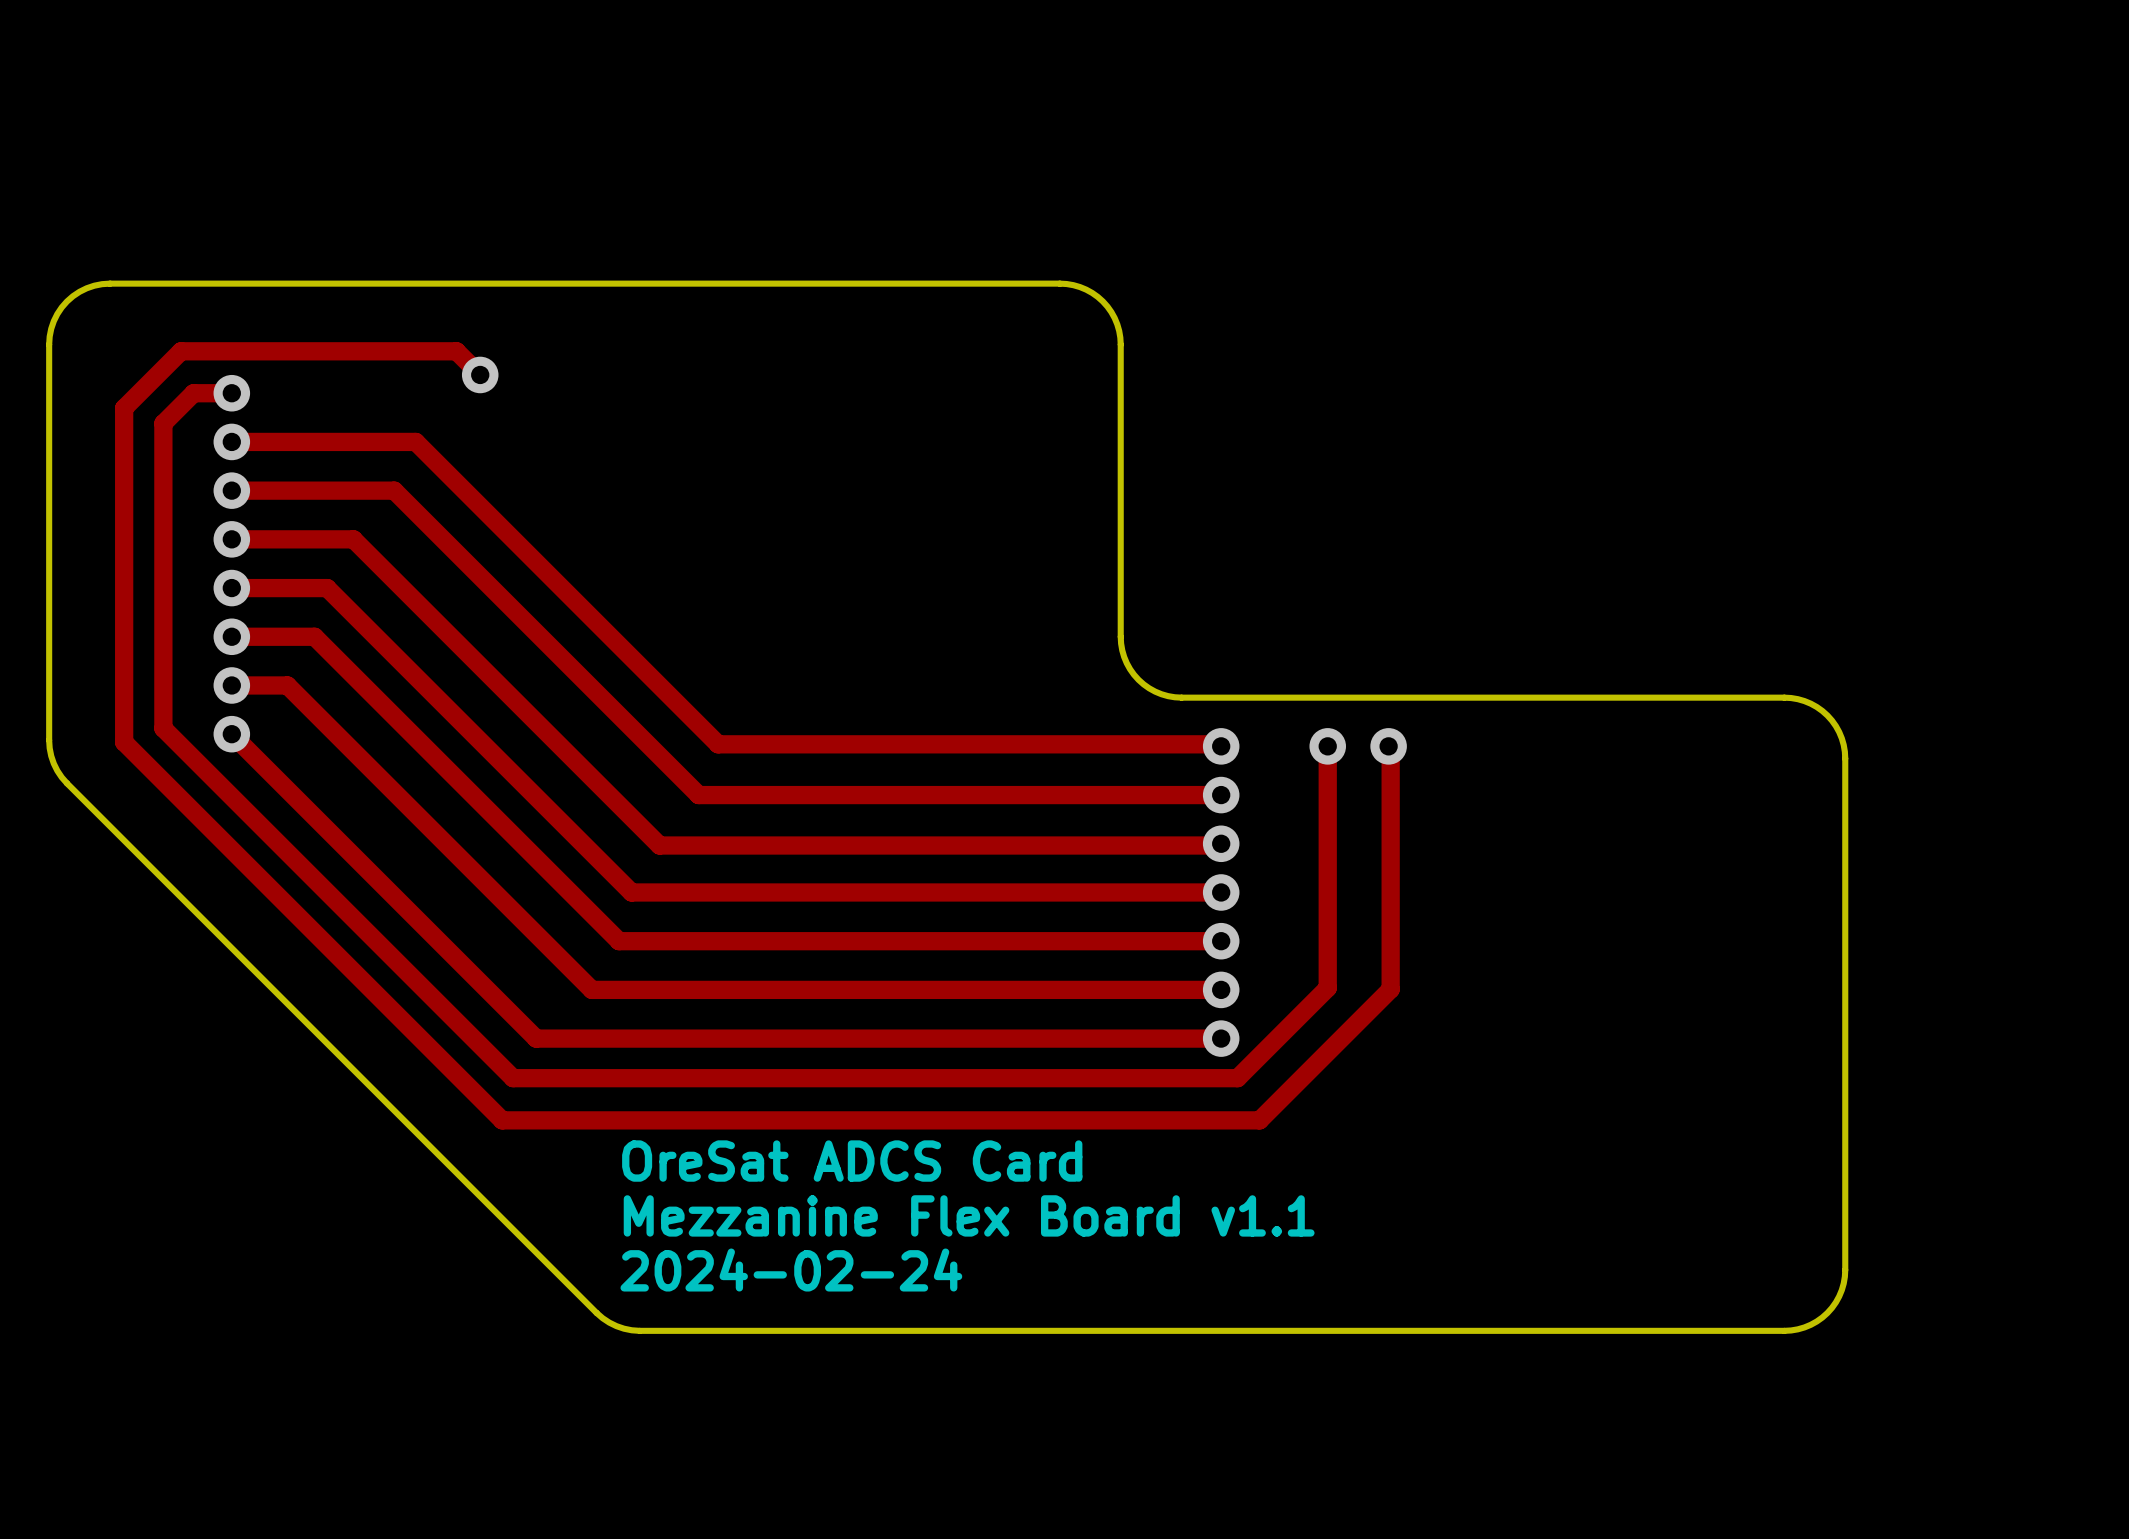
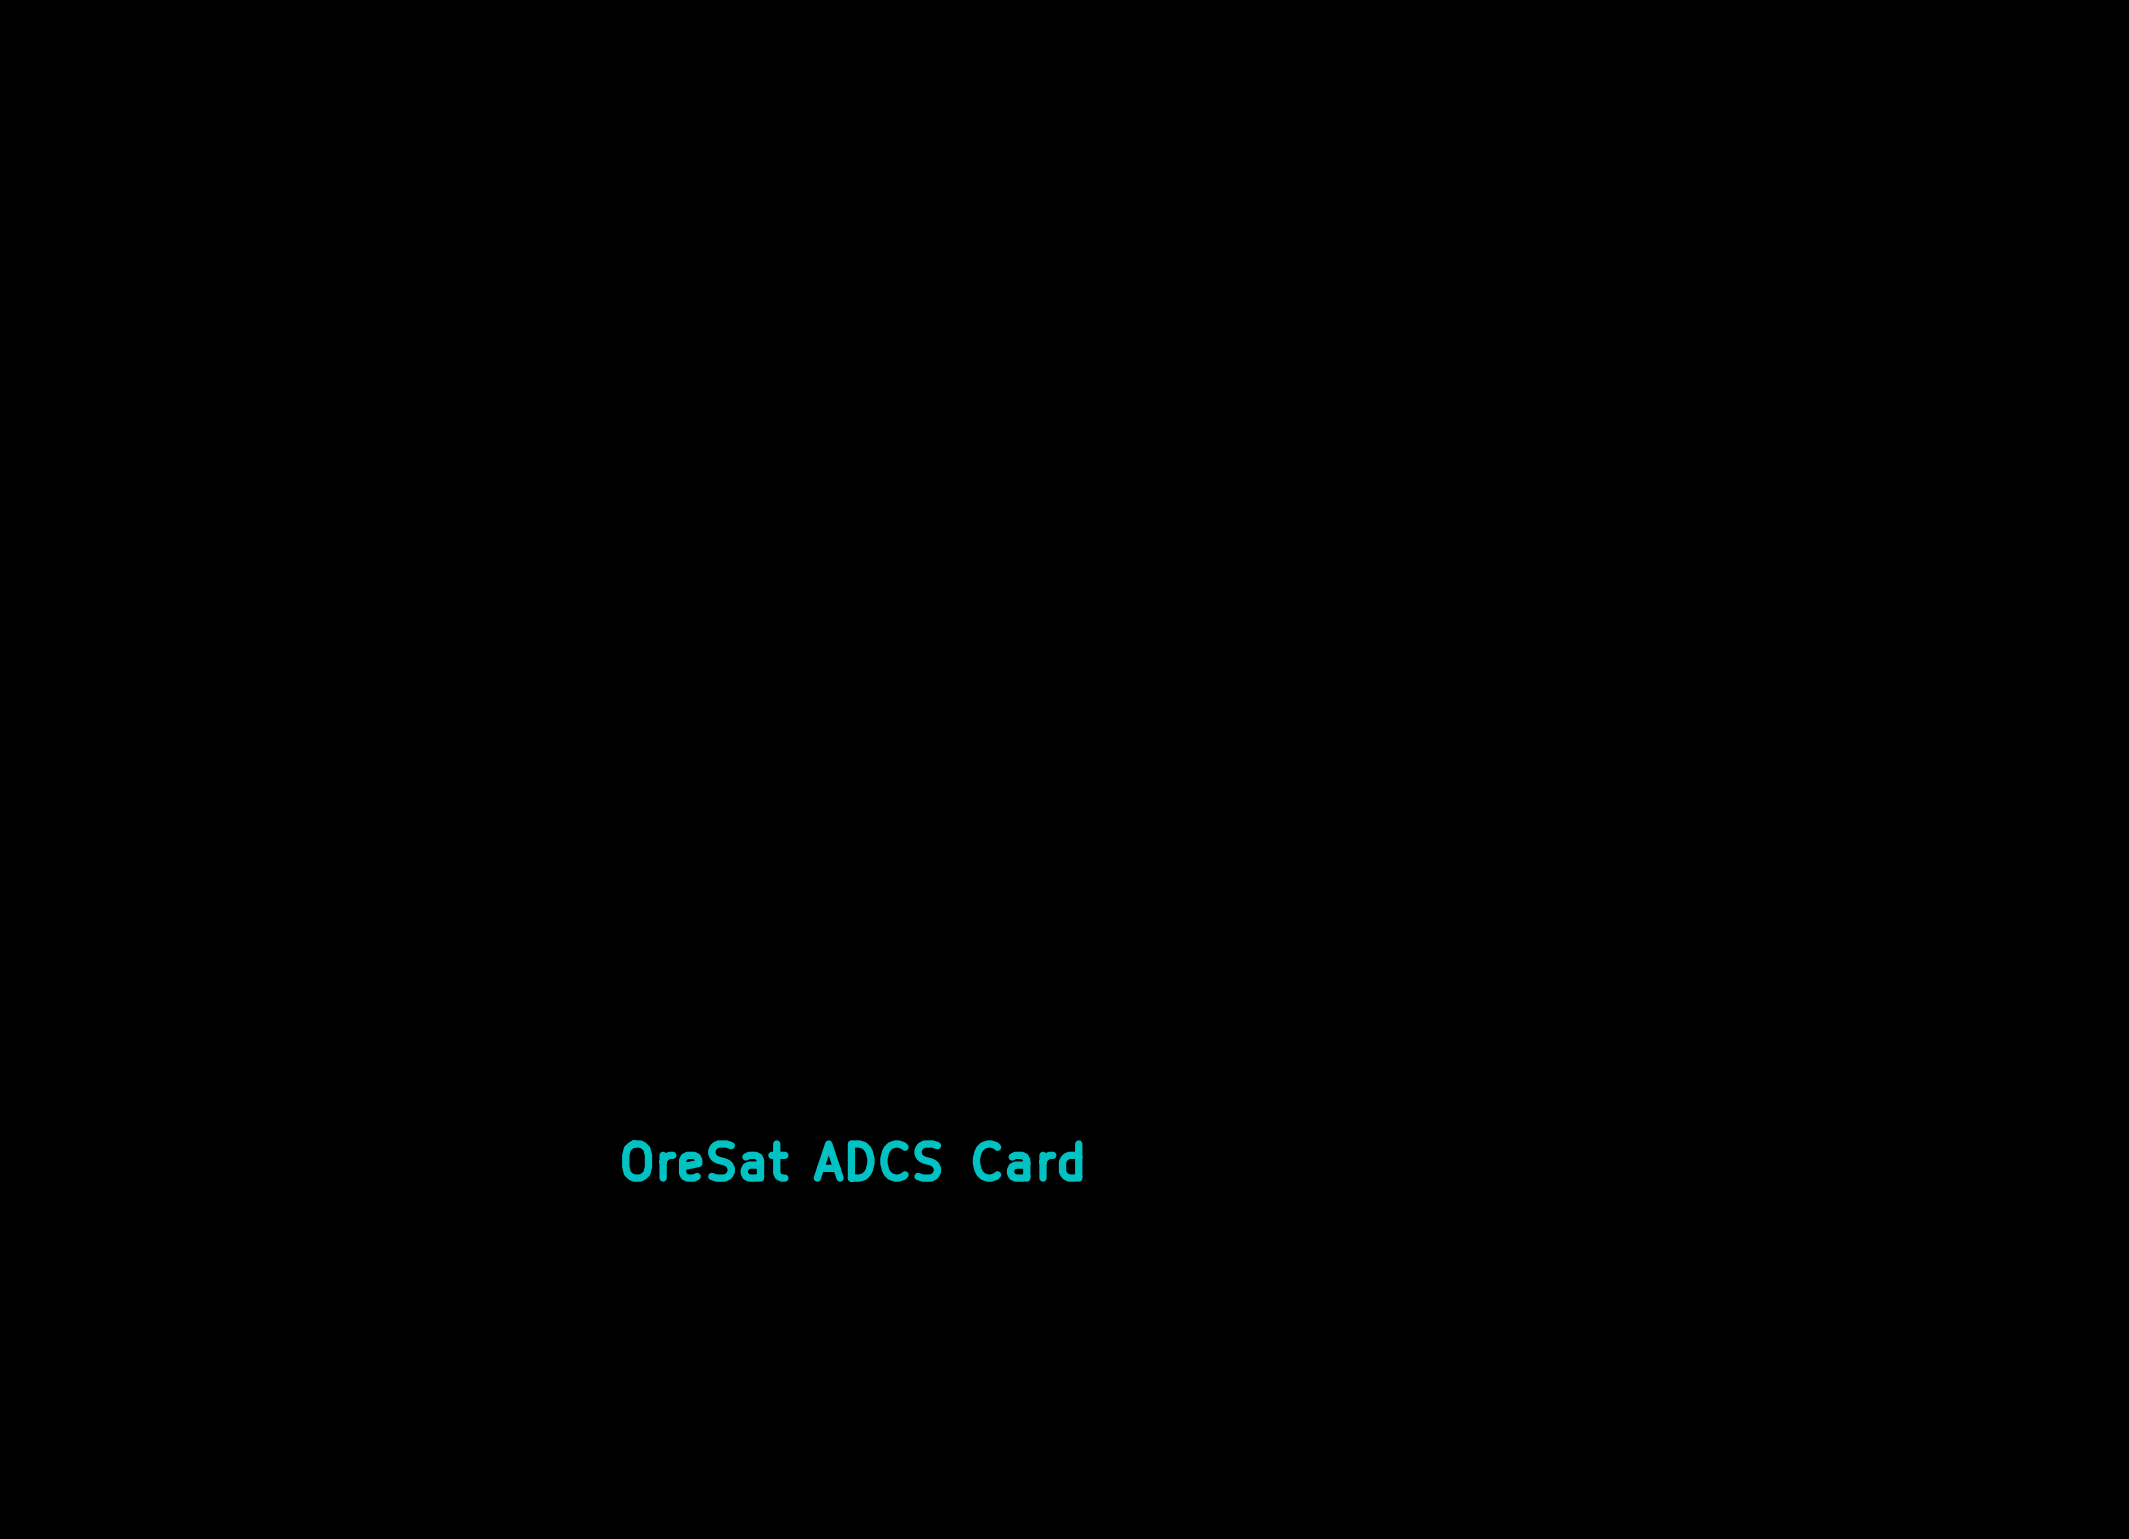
board edge: (110, 283) (1059, 283) (1073, 285) (1092, 292) (1102, 301) (1111, 312) (1119, 330) (1121, 643) (1124, 656) (1130, 669) (1138, 679) (1149, 688) (1161, 694) (1181, 697) (1784, 697) (1797, 699) (1816, 706) (1827, 715) (1835, 726) (1841, 738) (1845, 758) (1845, 1269) (1843, 1283) (1835, 1302) (1827, 1313) (1810, 1324) (1797, 1329) (1784, 1330) (639, 1330) (624, 1328) (609, 1322) (596, 1313) (66, 783) (53, 763) (49, 740) (49, 336) (57, 314) (72, 296) (94, 285) (110, 283) -> none
track: (480, 374) (456, 351) (181, 351) (124, 408) (124, 742) (502, 1120) (1259, 1120) (1390, 989) (1390, 748) (1388, 746) -> none
via: (480, 374) -> none
track: (231, 393) (193, 393) (163, 423) (163, 728) (513, 1078) (1237, 1078) (1327, 988) (1327, 746) -> none
via: (231, 393) -> none
track: (231, 441) (415, 441) (718, 744) (1219, 744) (1221, 746) -> none
via: (231, 441) -> none
track: (231, 490) (394, 490) (698, 795) (1221, 795) -> none
via: (231, 490) -> none
track: (231, 539) (353, 539) (659, 845) (1219, 845) (1221, 843) -> none
via: (231, 539) -> none
track: (231, 588) (327, 588) (631, 892) (1221, 892) -> none
via: (231, 588) -> none
track: (231, 636) (314, 636) (619, 941) (1221, 941) -> none
via: (231, 636) -> none
track: (231, 685) (287, 685) (591, 989) (1221, 989) -> none
via: (231, 685) -> none
track: (231, 734) (536, 1038) (1221, 1038) -> none
via: (231, 734) -> none
via: (1221, 746) -> none
via: (1327, 746) -> none
via: (1388, 746) -> none
via: (1221, 795) -> none
via: (1221, 843) -> none
via: (1221, 892) -> none
via: (1221, 941) -> none
via: (1221, 989) -> none
via: (1221, 1038) -> none
text: Mezzanine Flex Board v1.1 (969, 1215) -> none
text: 2024-02-24 (791, 1270) -> none

